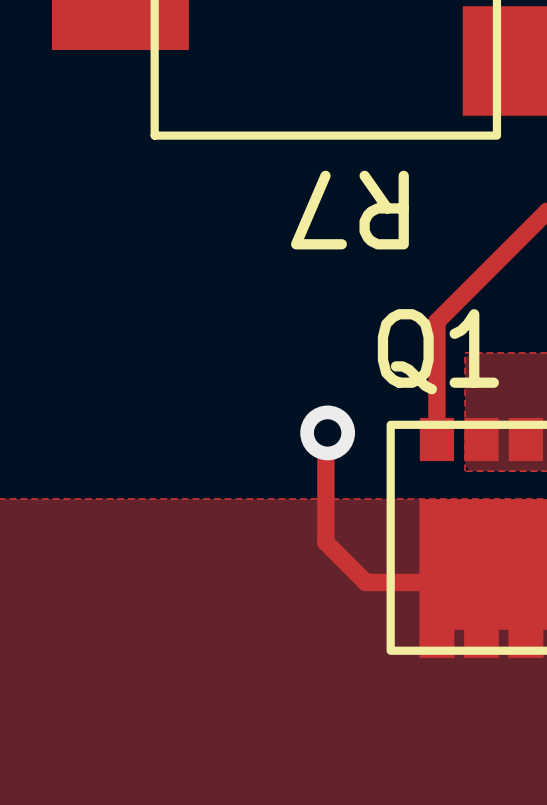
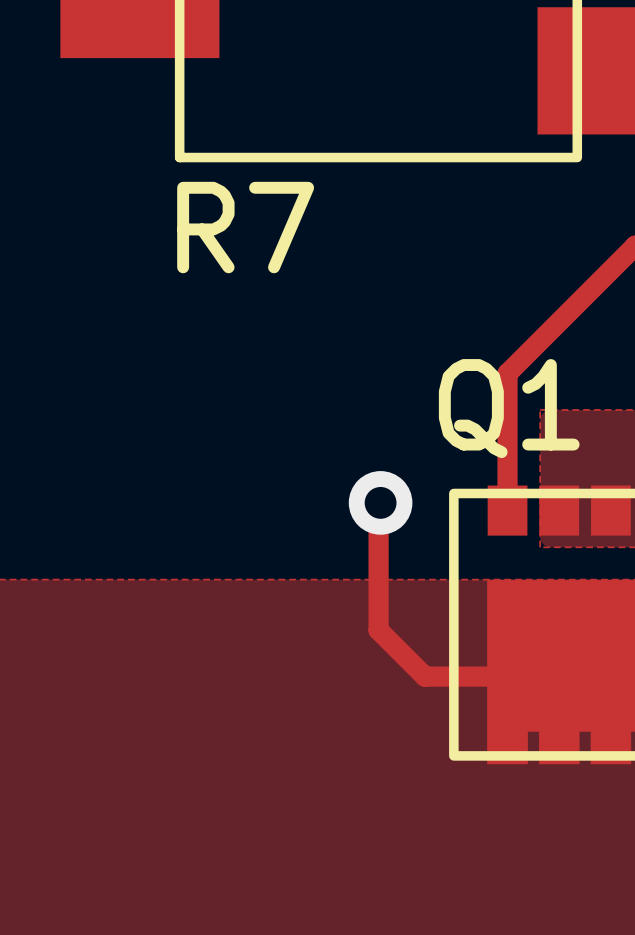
R7 name rotation: 0° (349, 210) -> 180° (245, 227)

